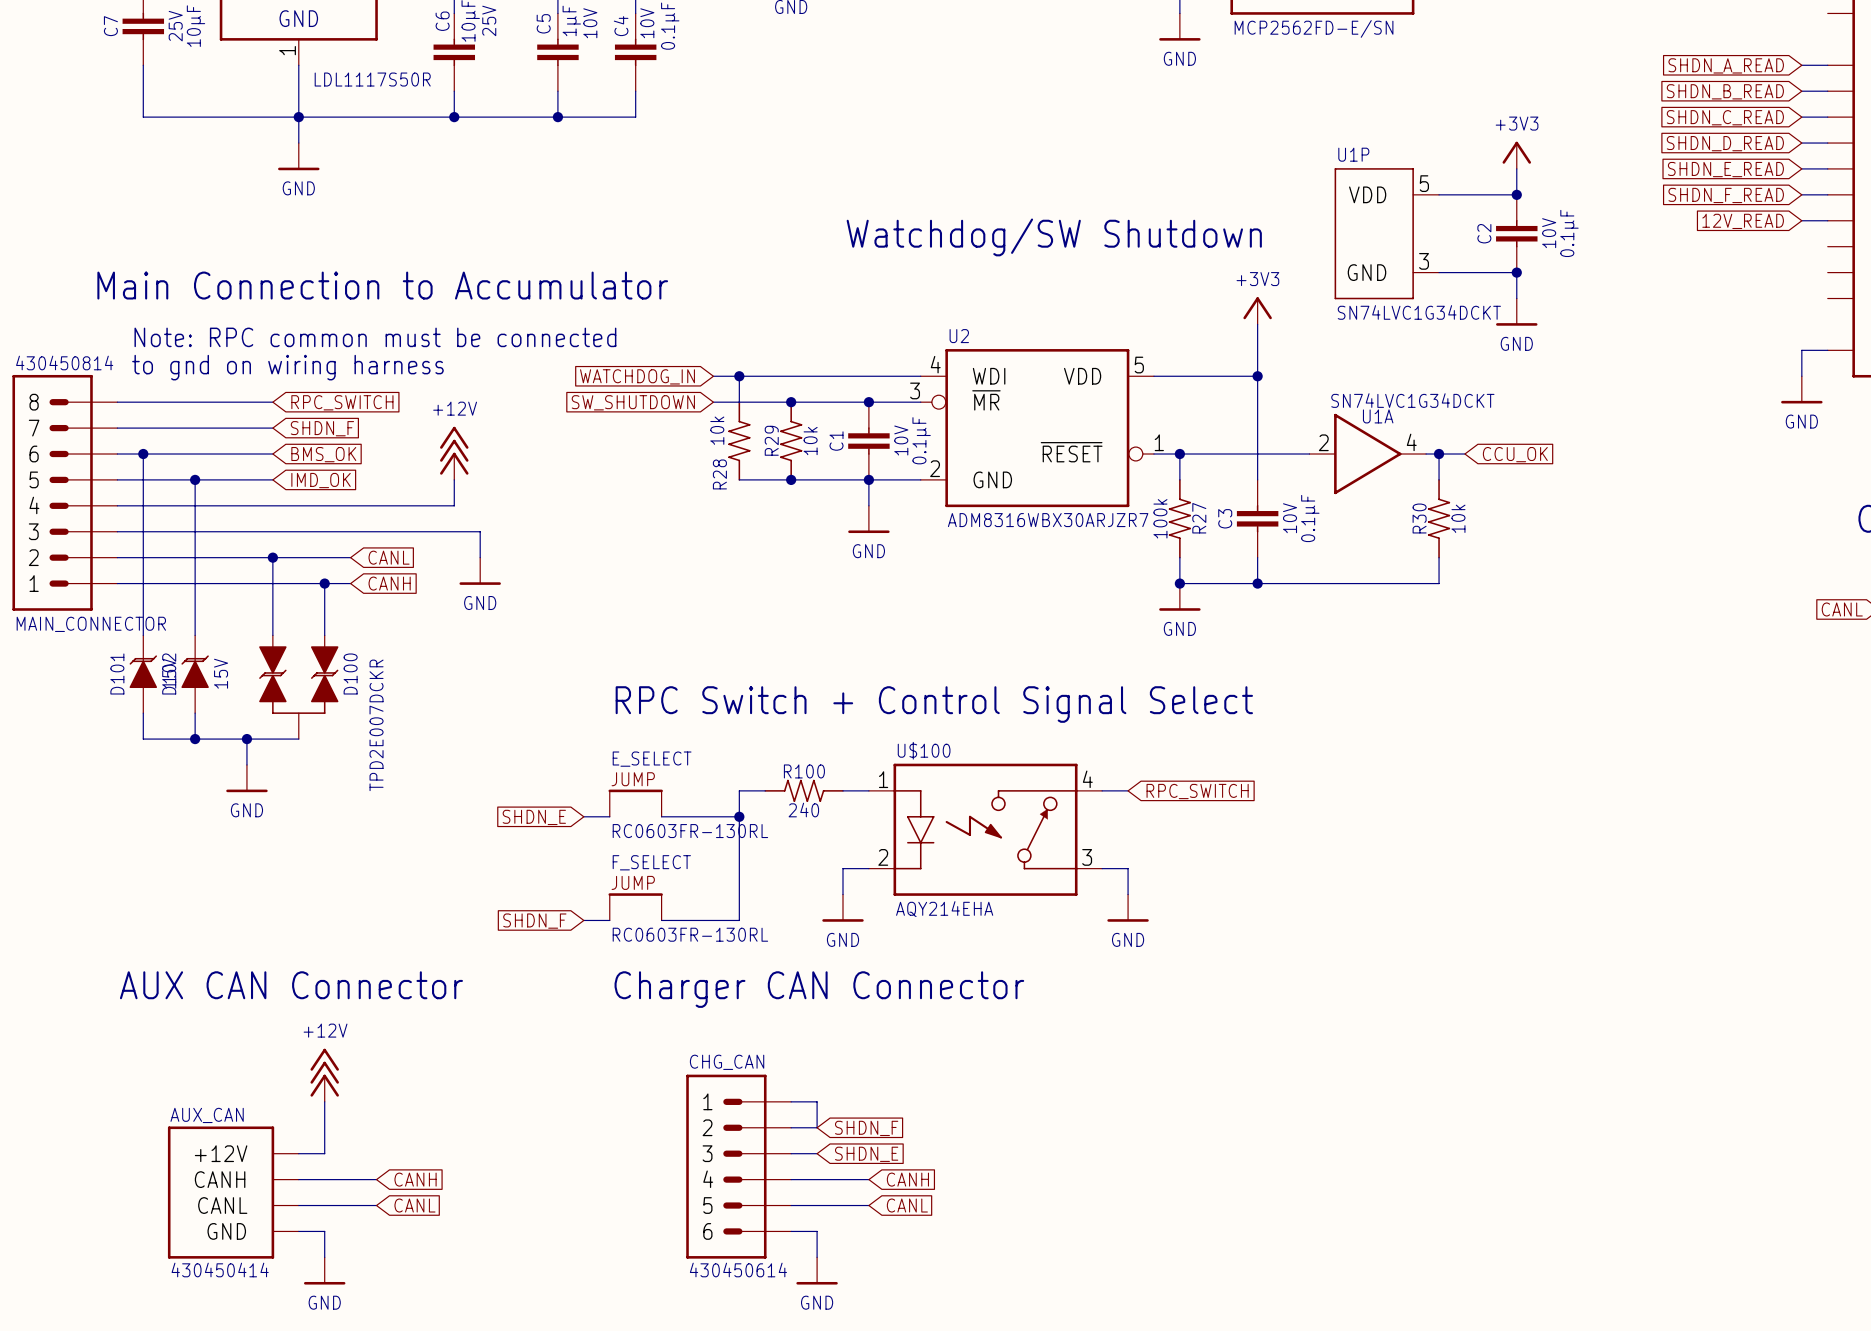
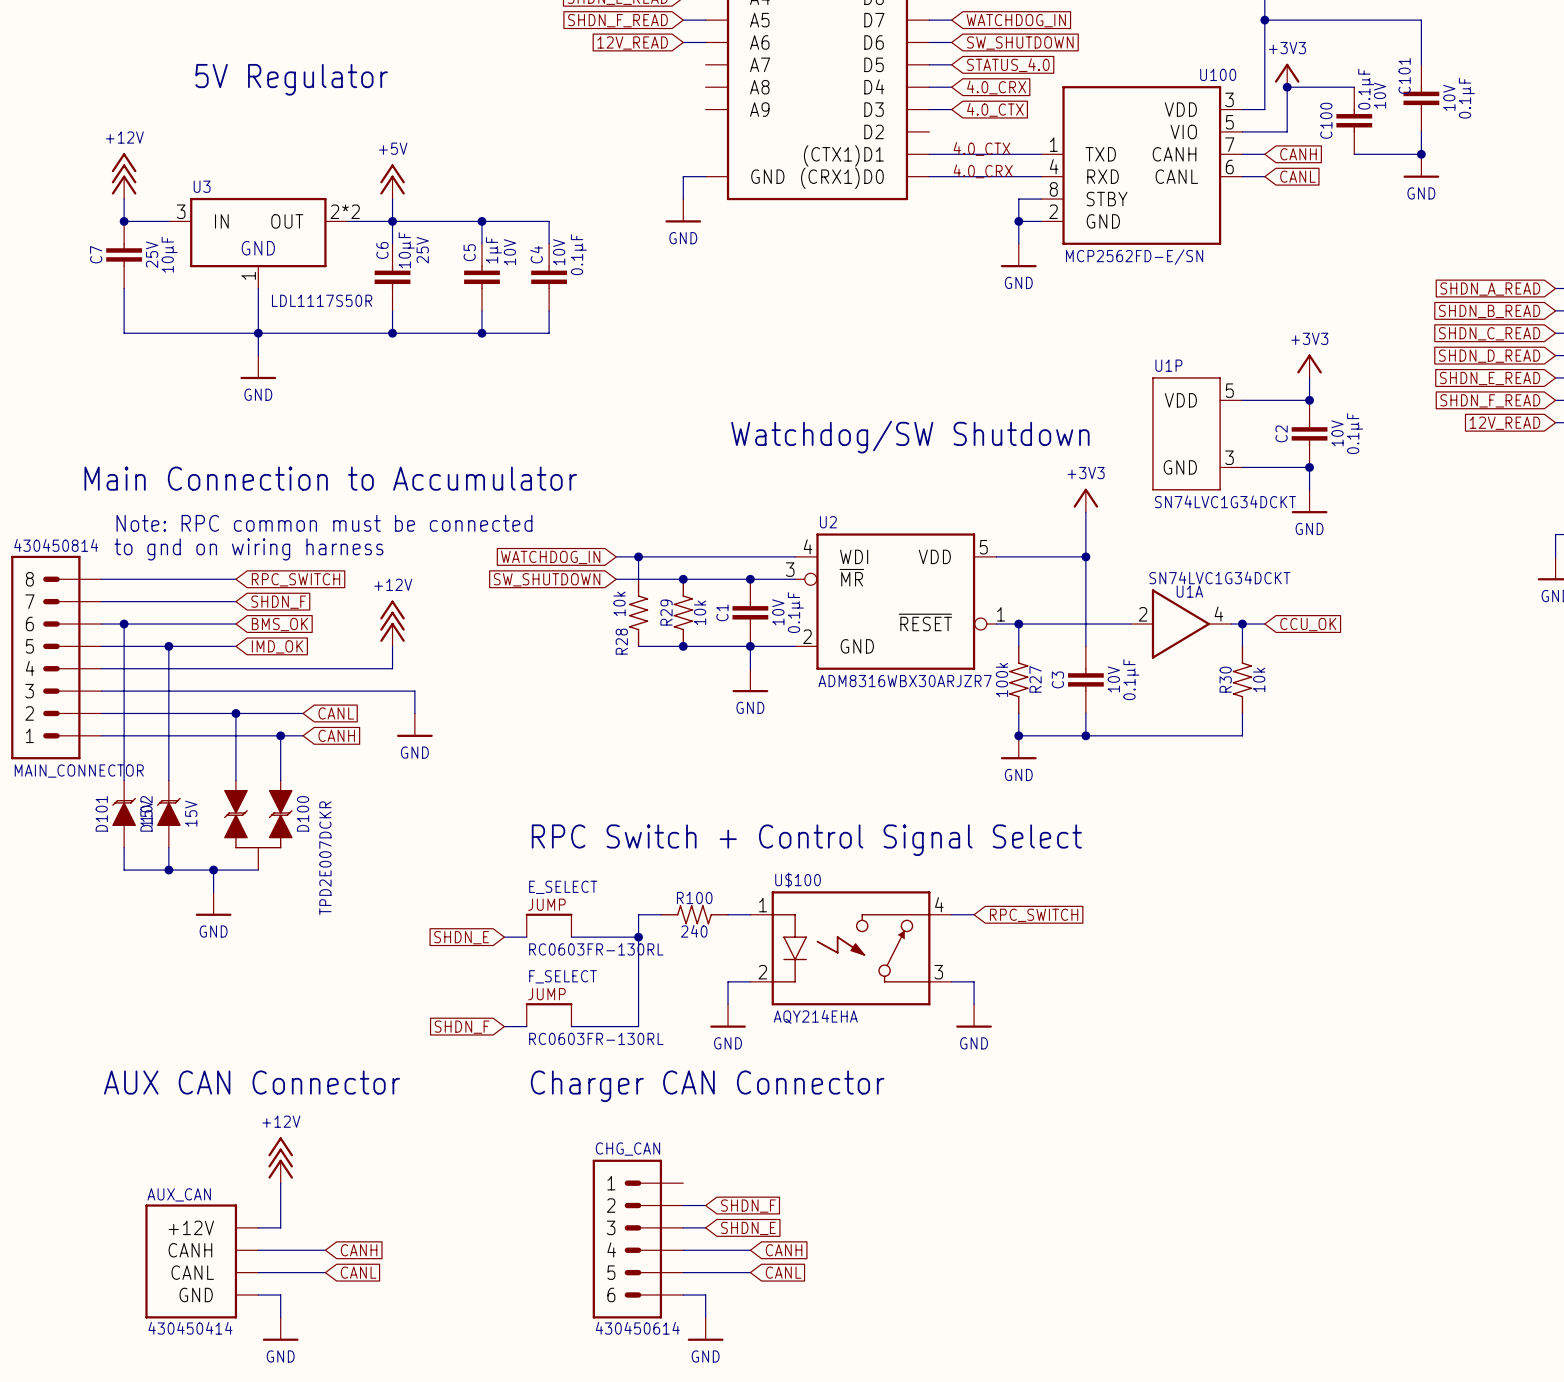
wire: (791, 1101) (817, 1101) (817, 1127) -> none

